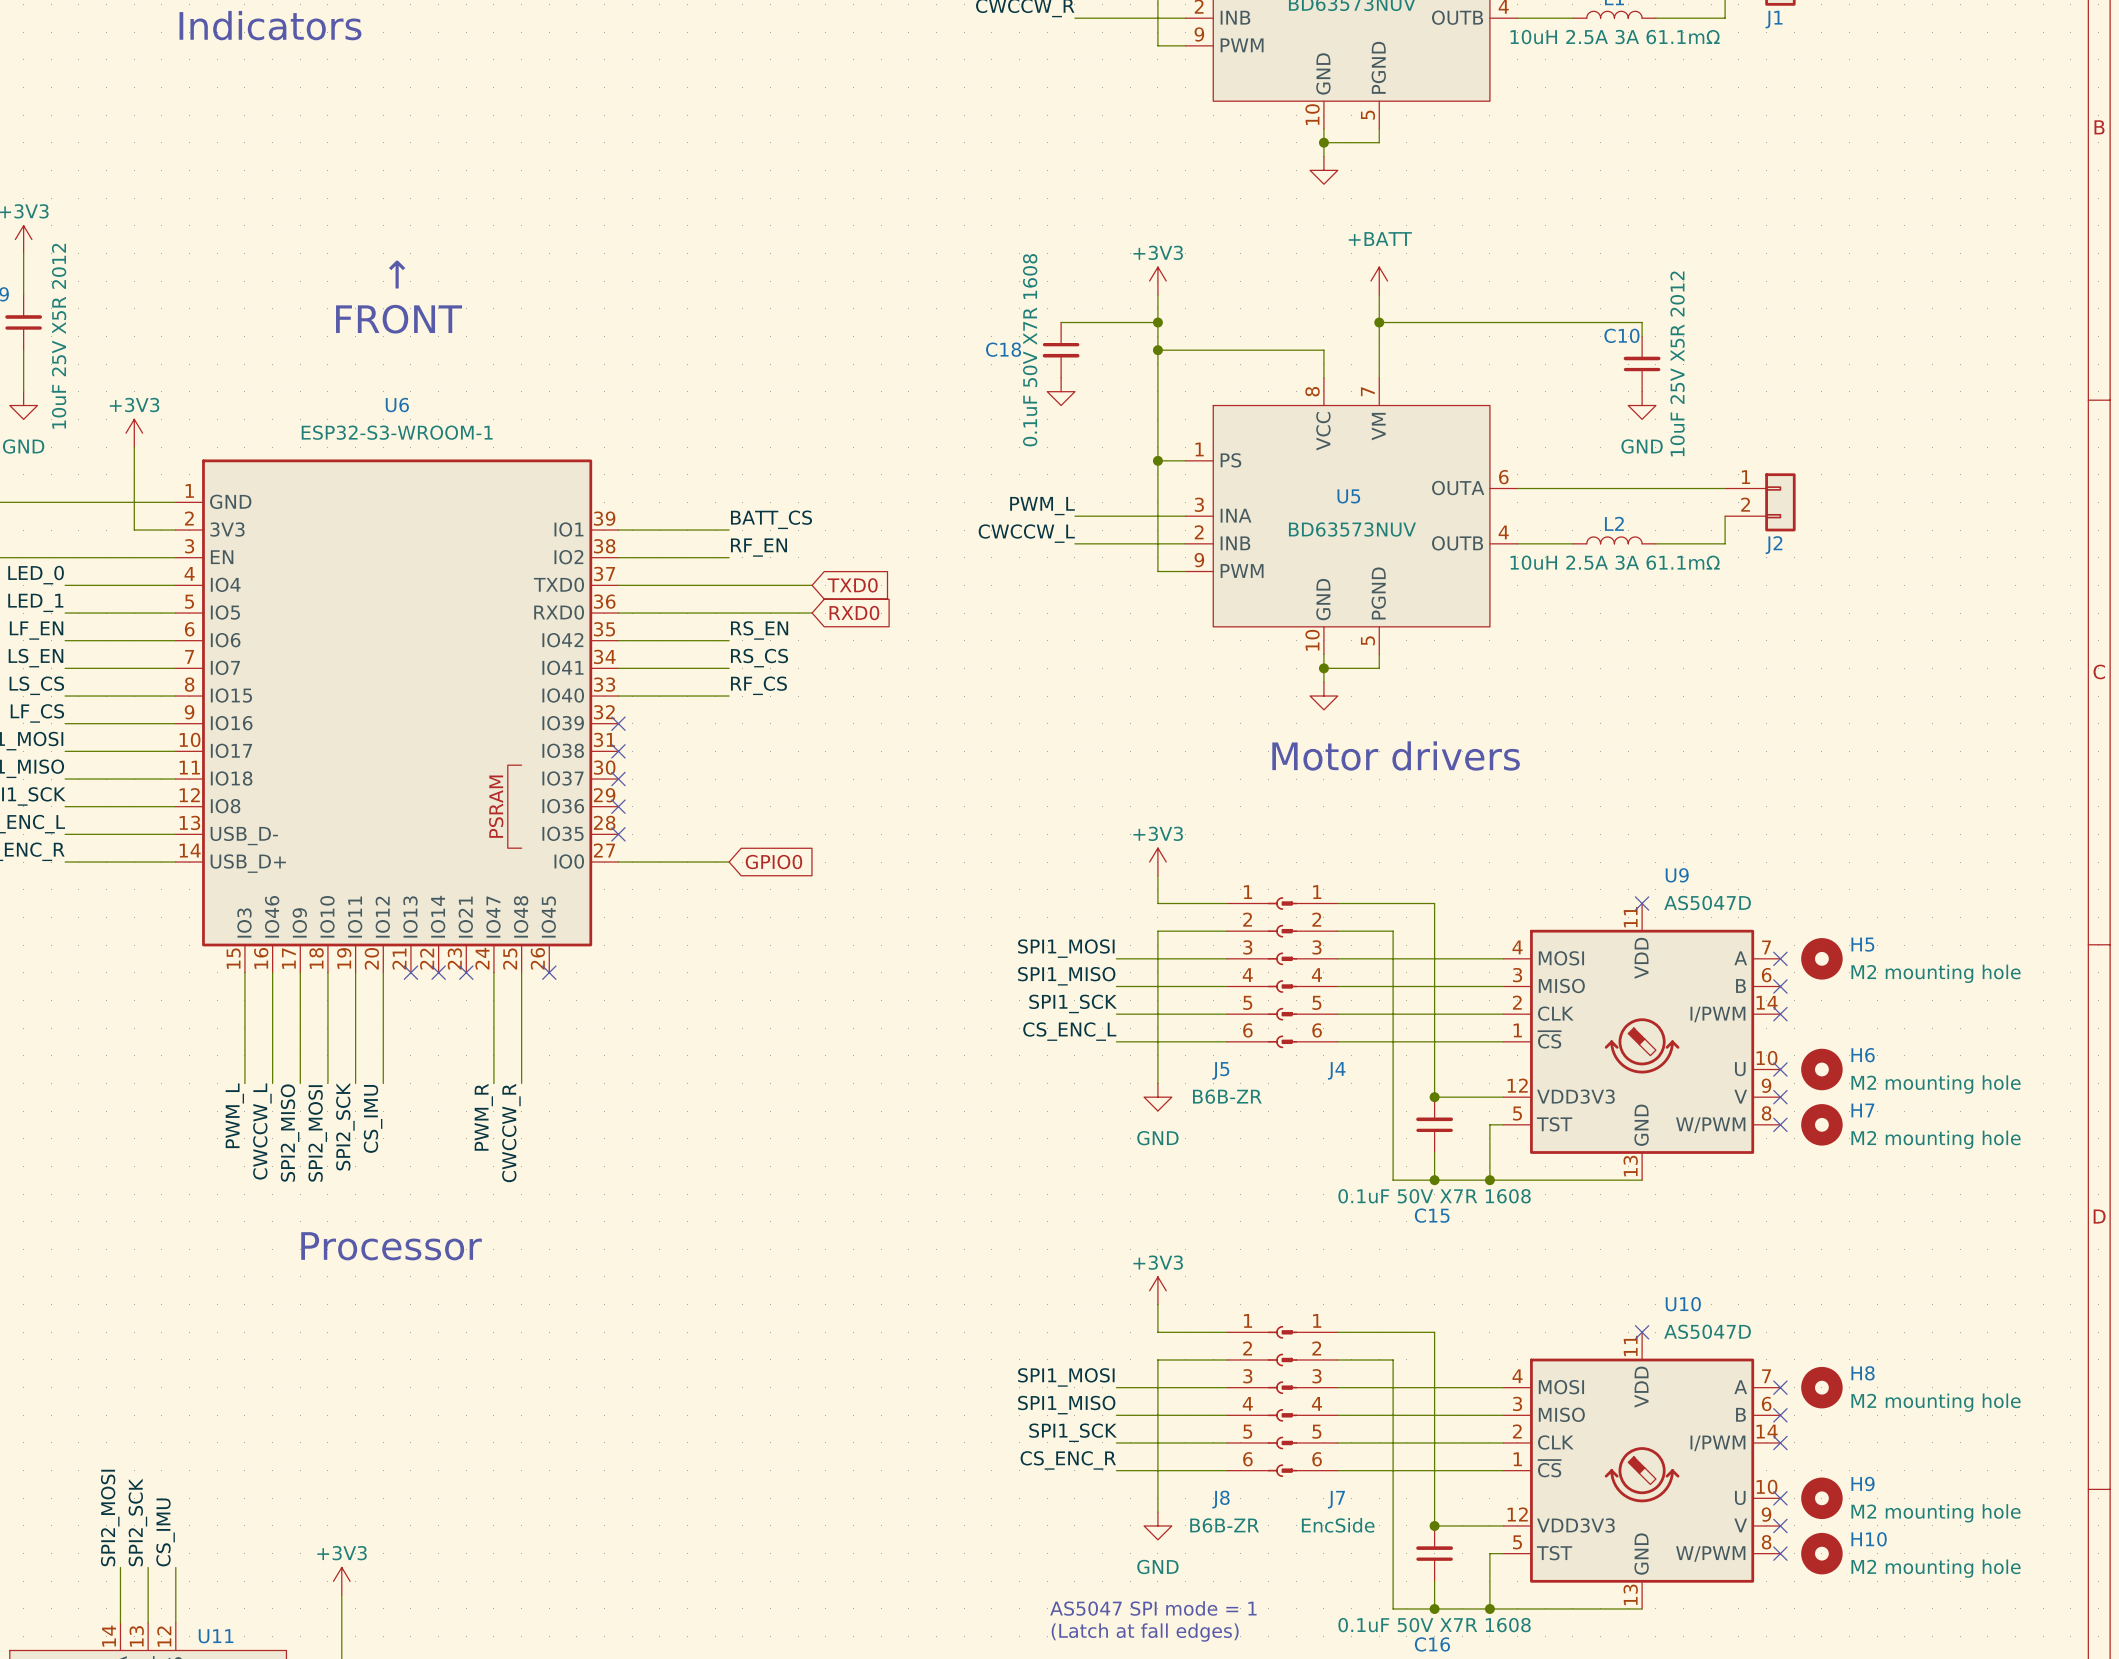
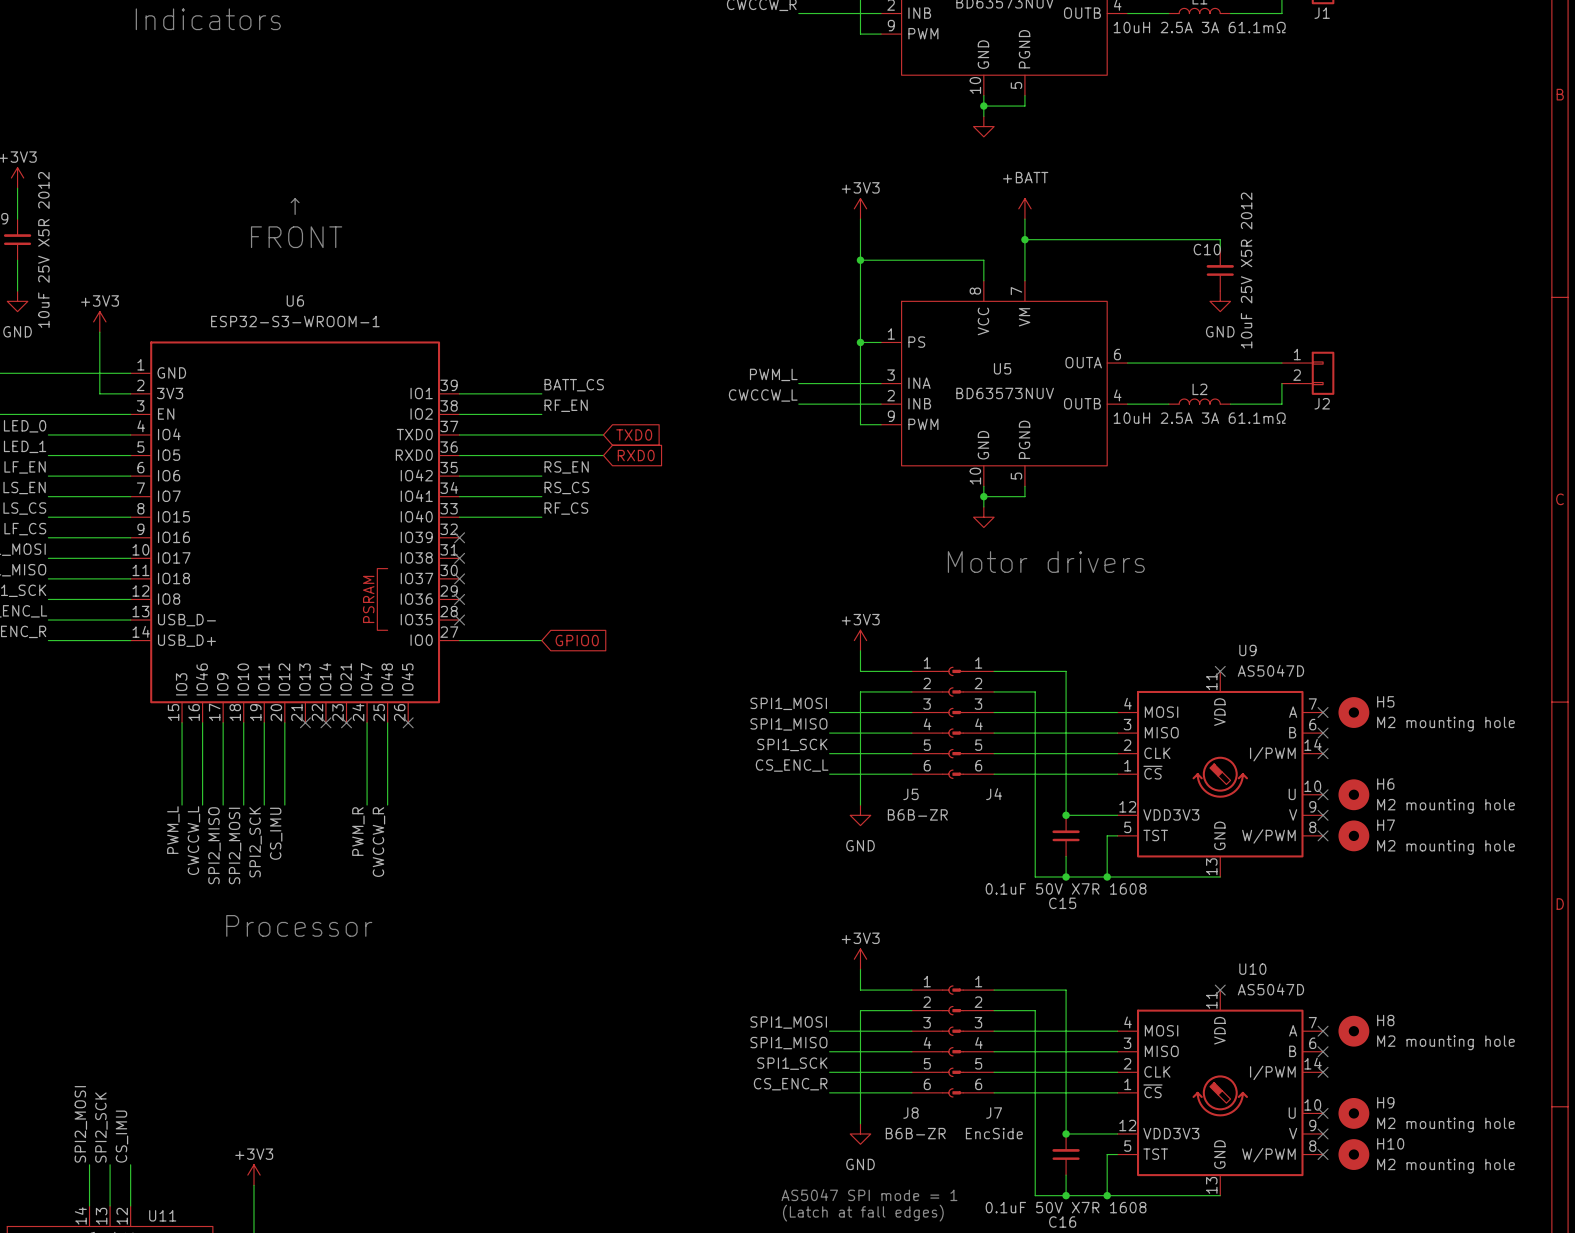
wire: (1061, 322) (1157, 322) -> none
junction: (1157, 322) -> none
C18: (1061, 350) -> none
power symbol: (1061, 391) -> none

